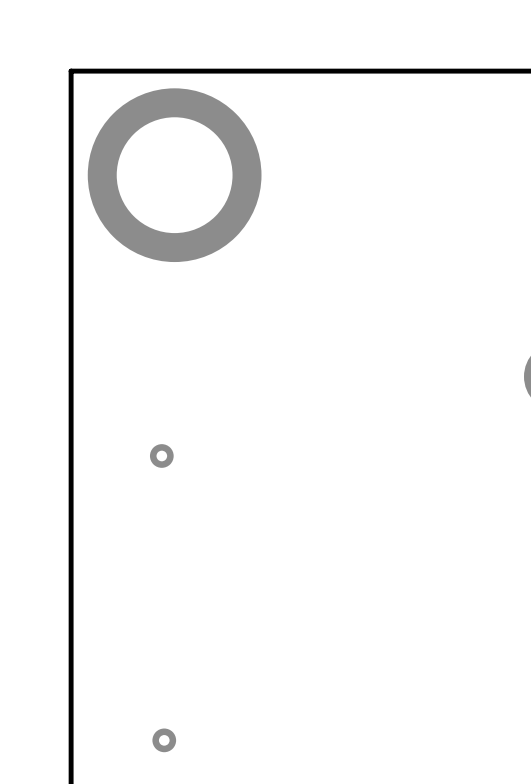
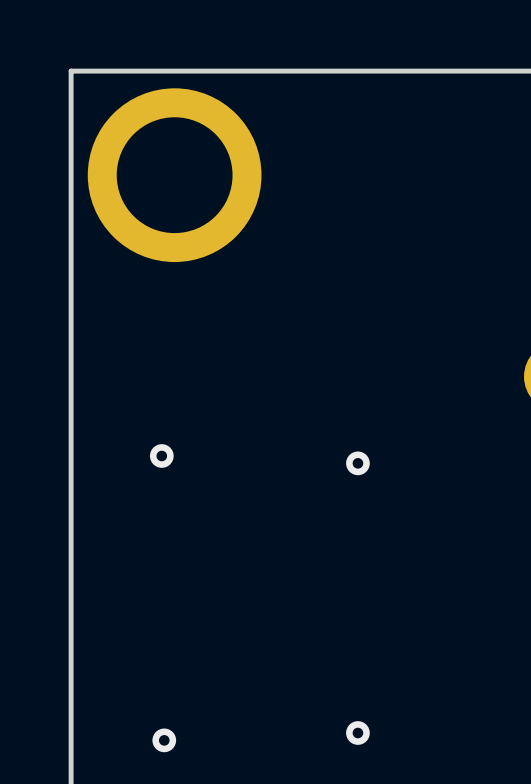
via: none -> (357, 463)
via: none -> (357, 733)

